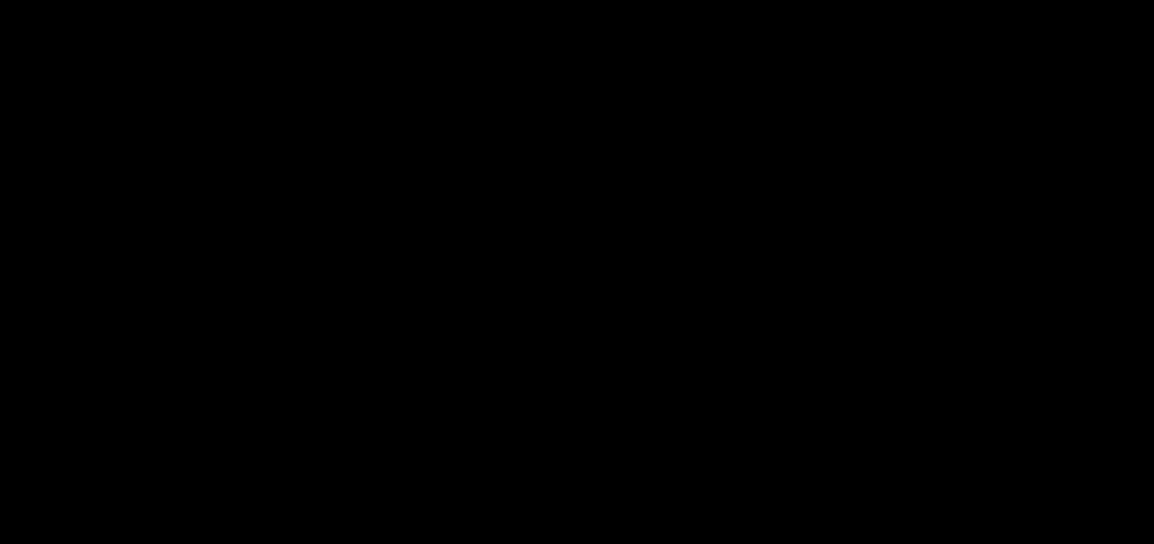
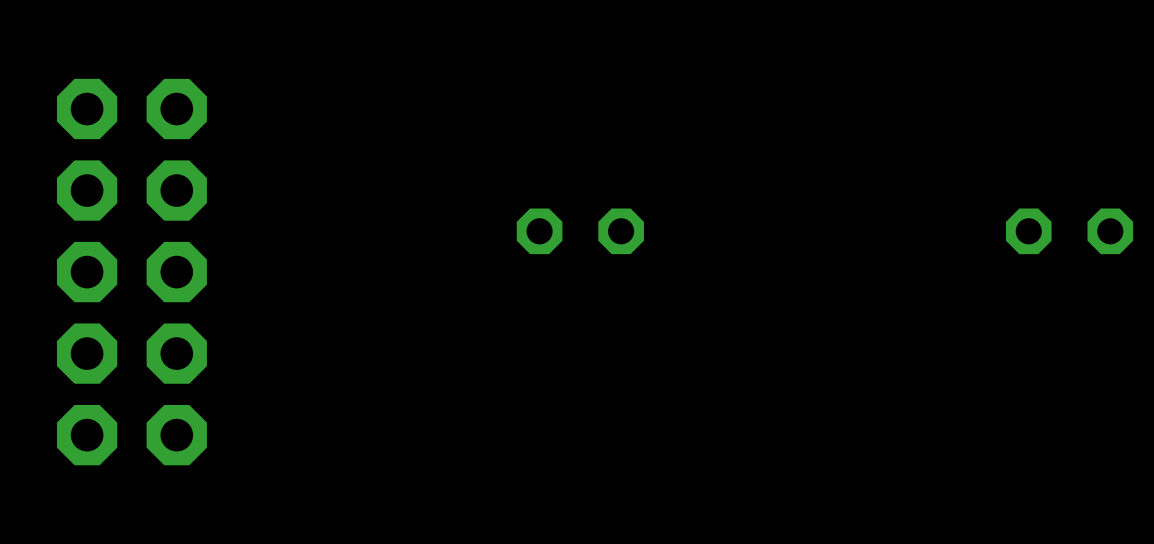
part: none -> (580, 231)
part: none -> (1069, 231)
part: none -> (131, 272)

